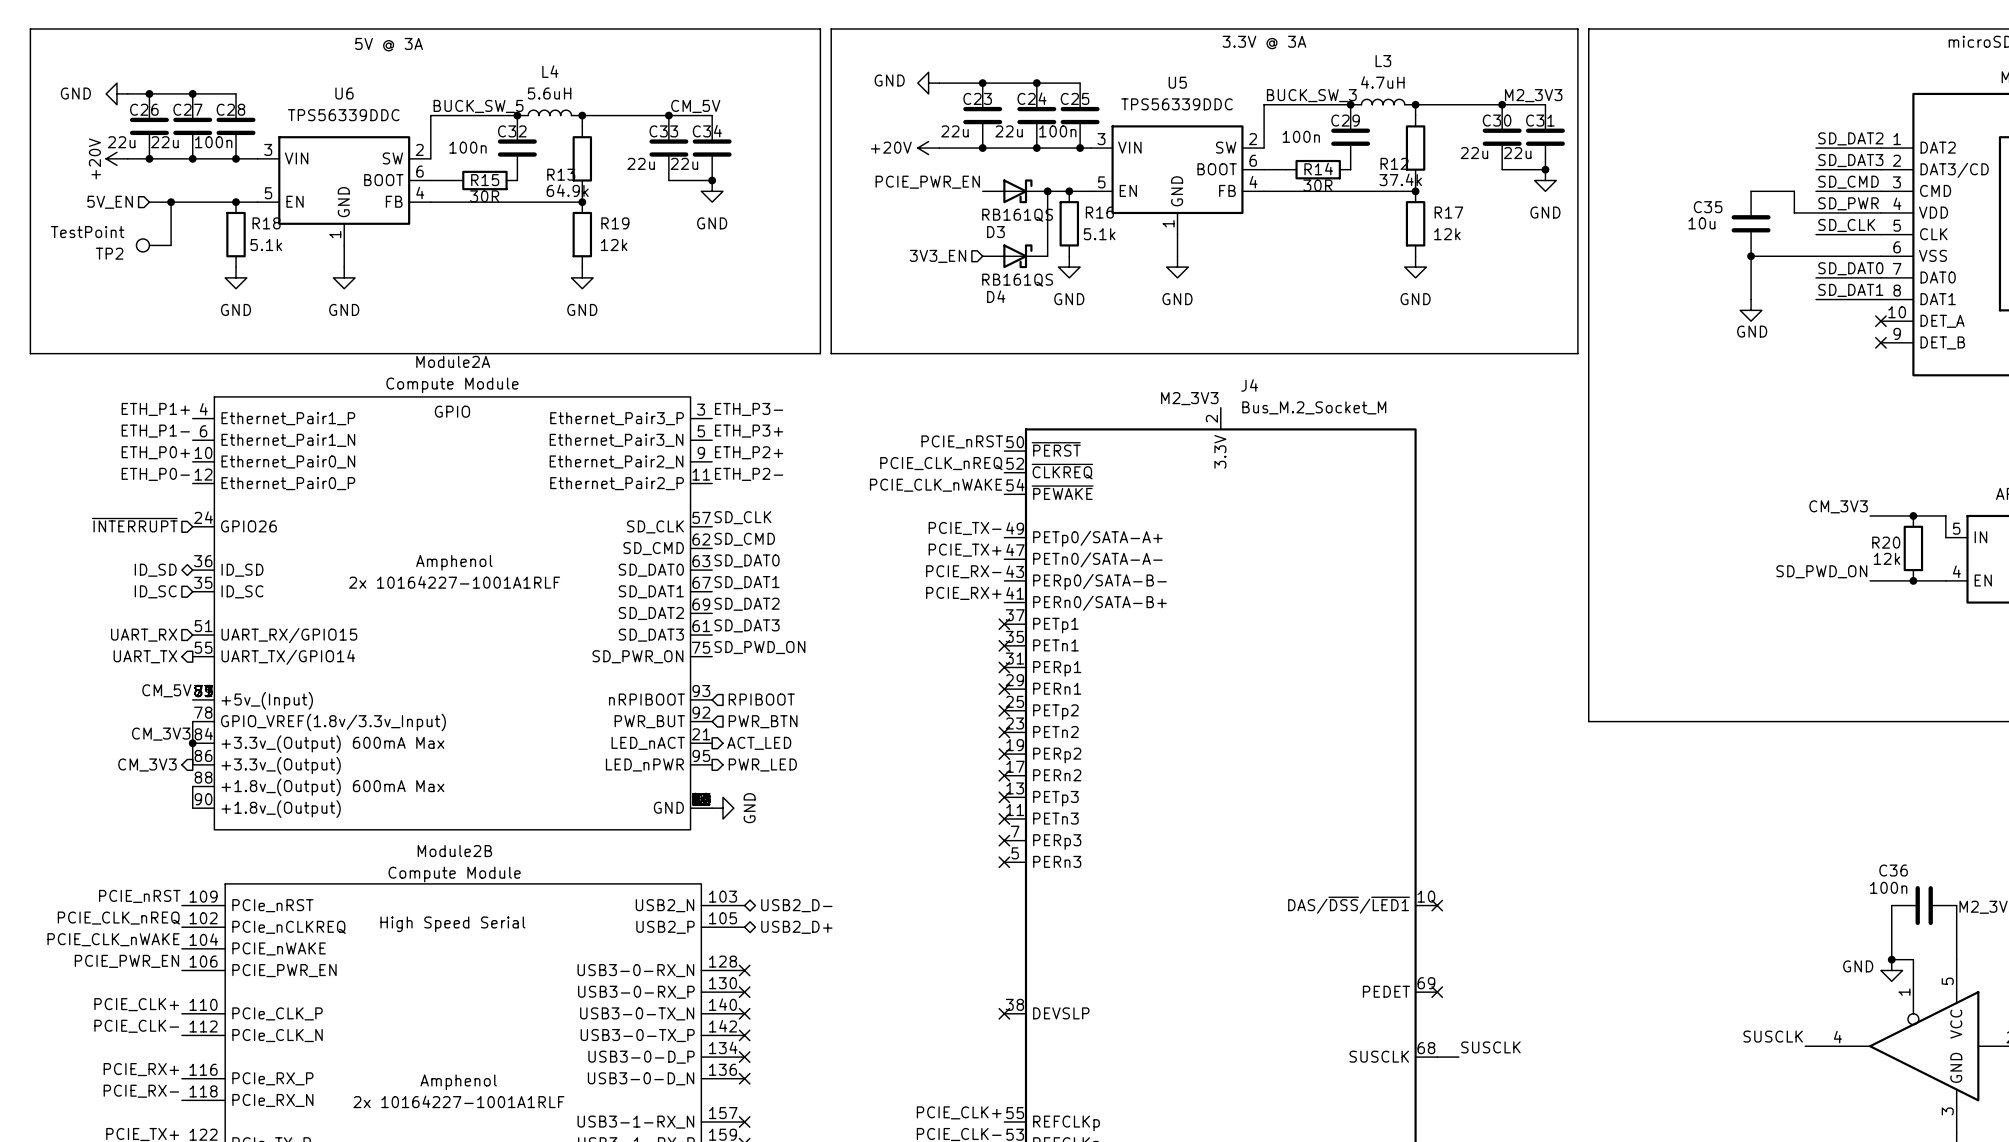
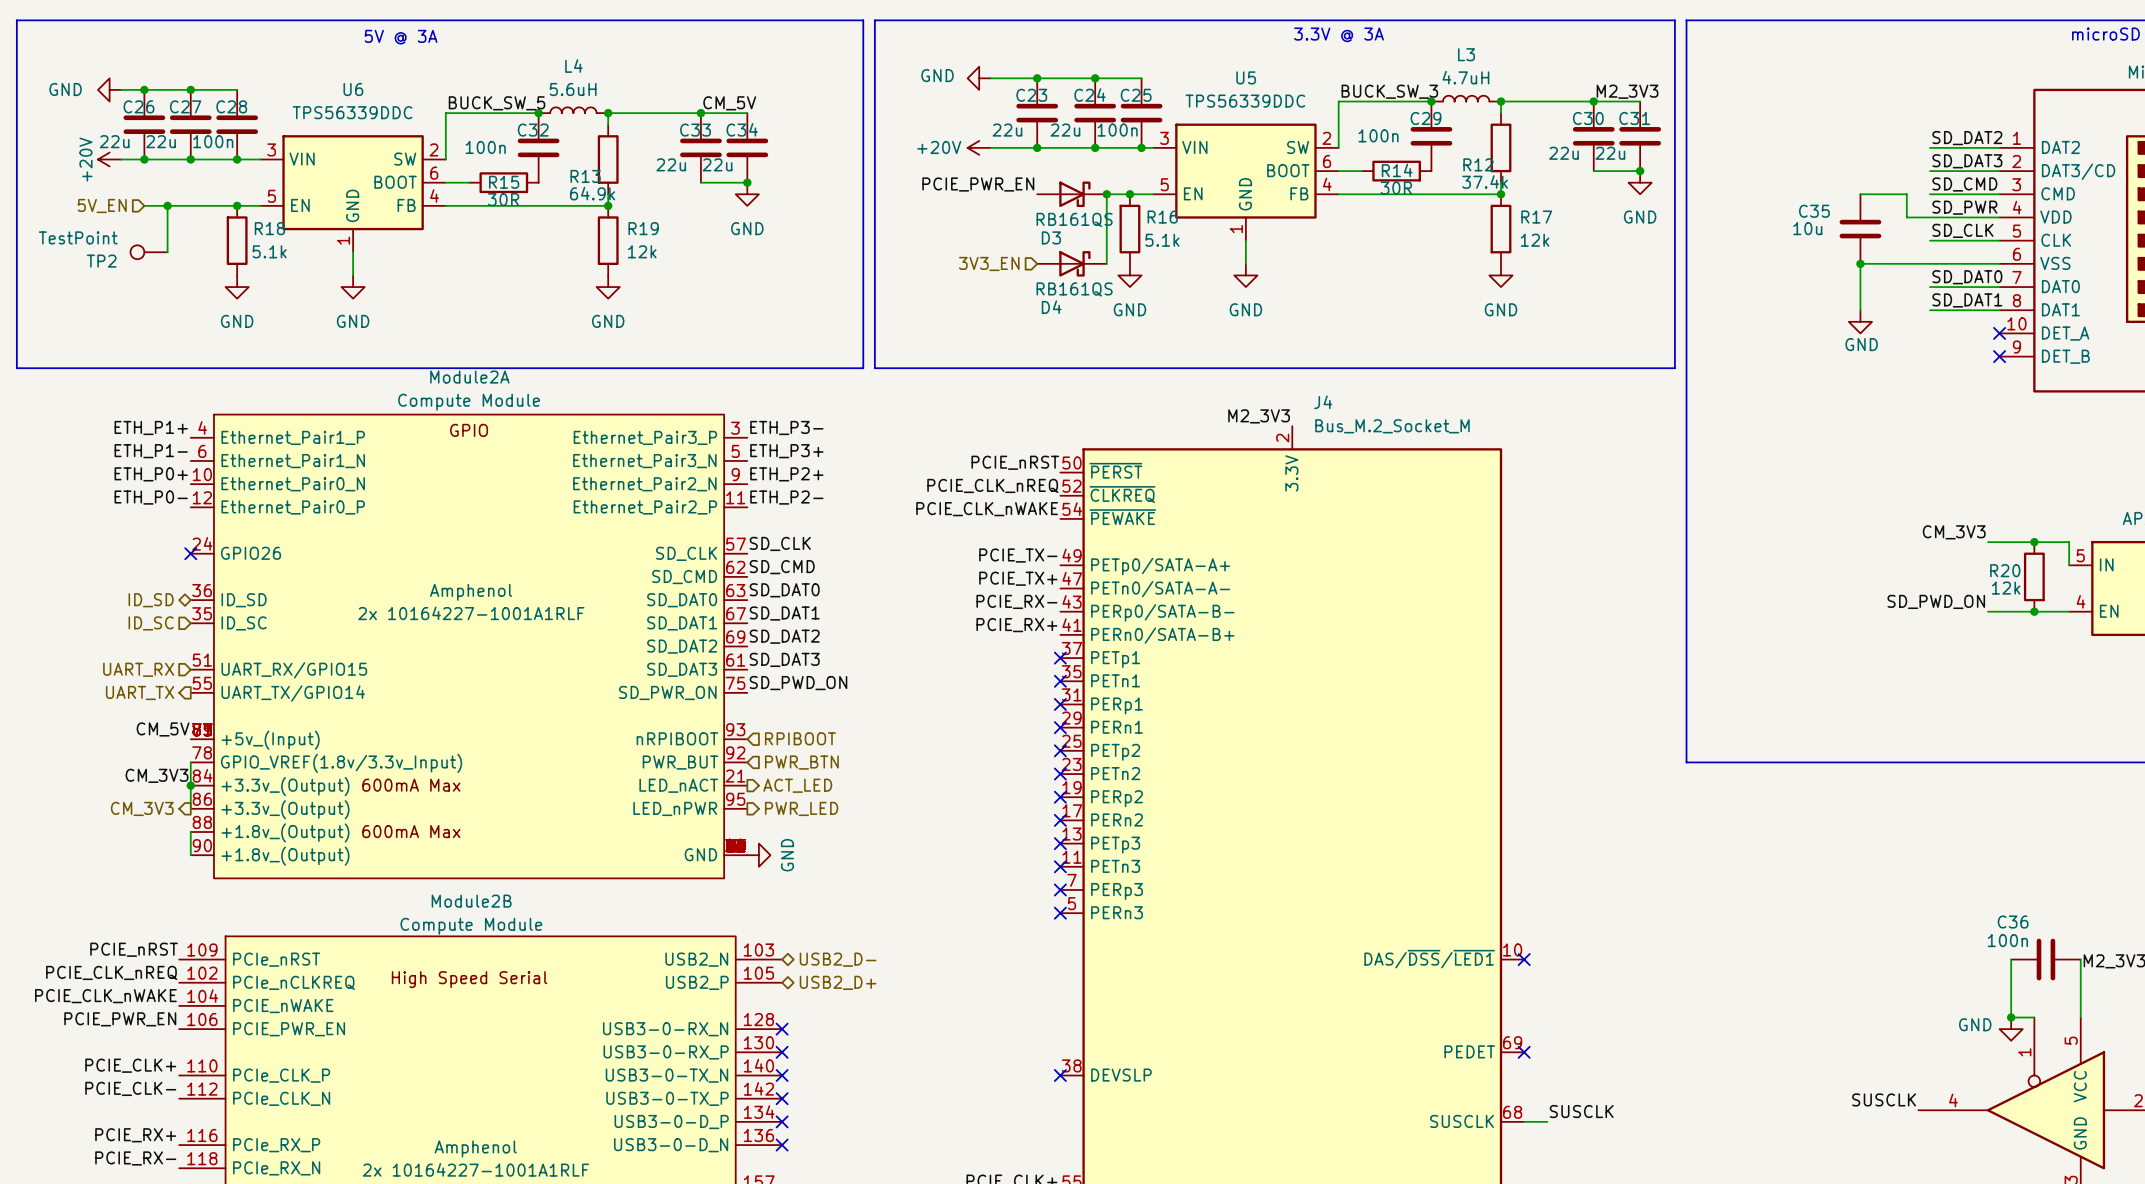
hierarchical label: ~{INTERRUPT} (134, 525) -> none
no-connect mark: none -> (190, 553)

